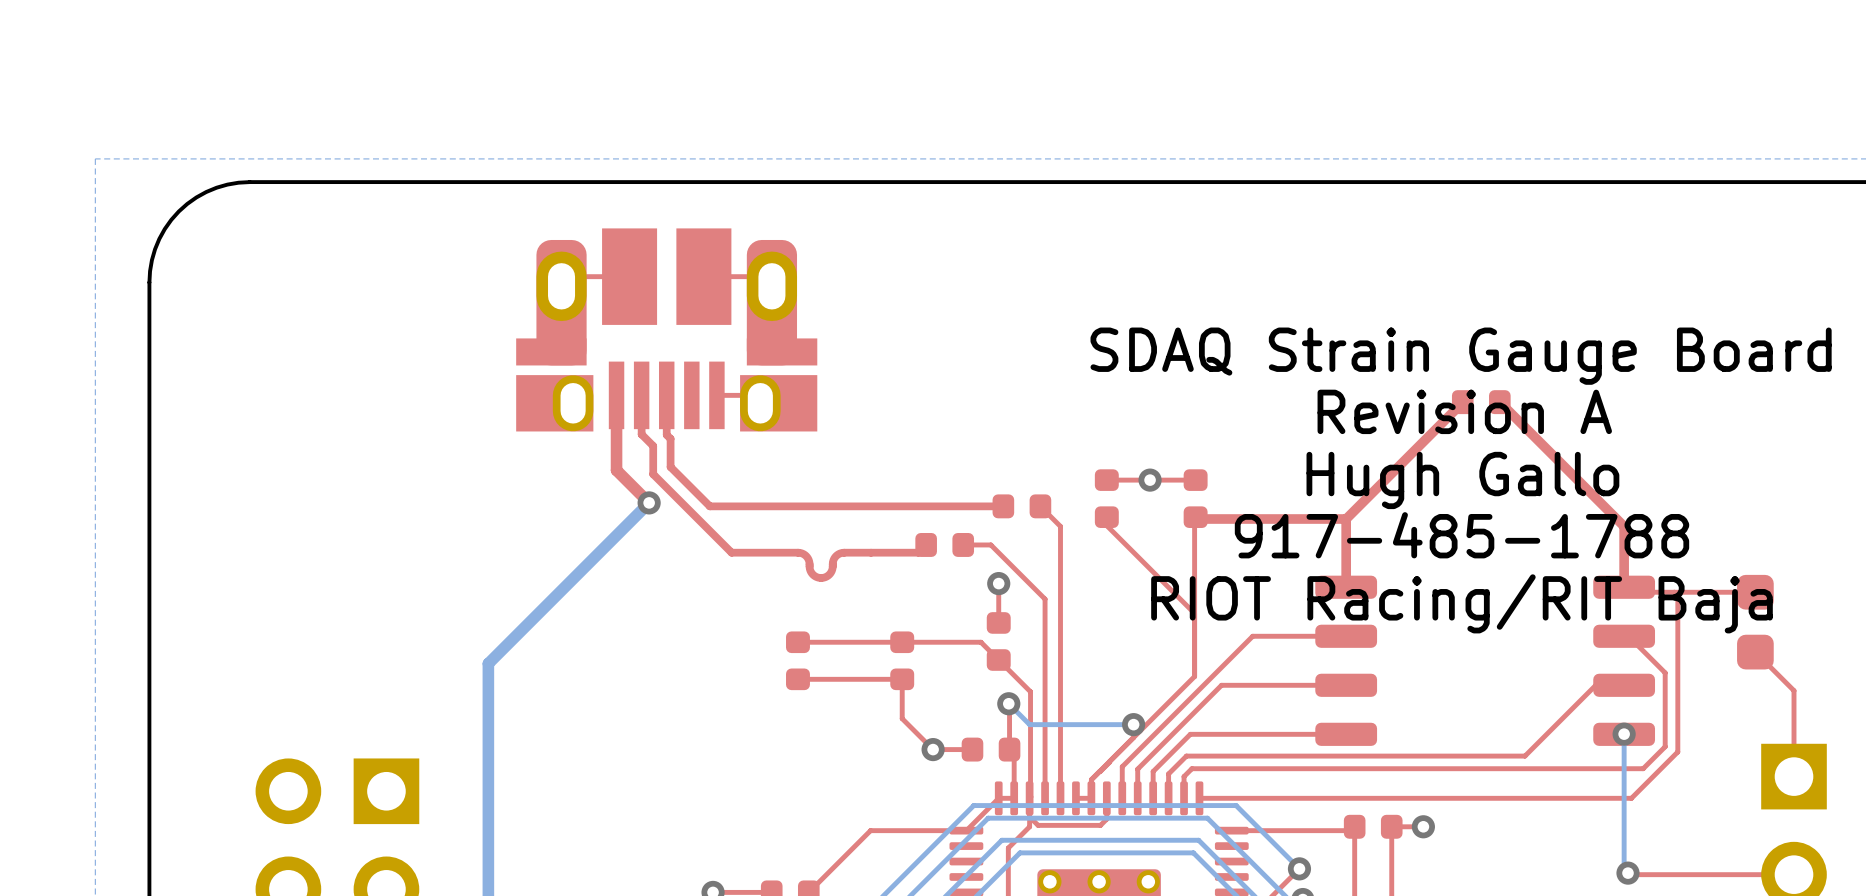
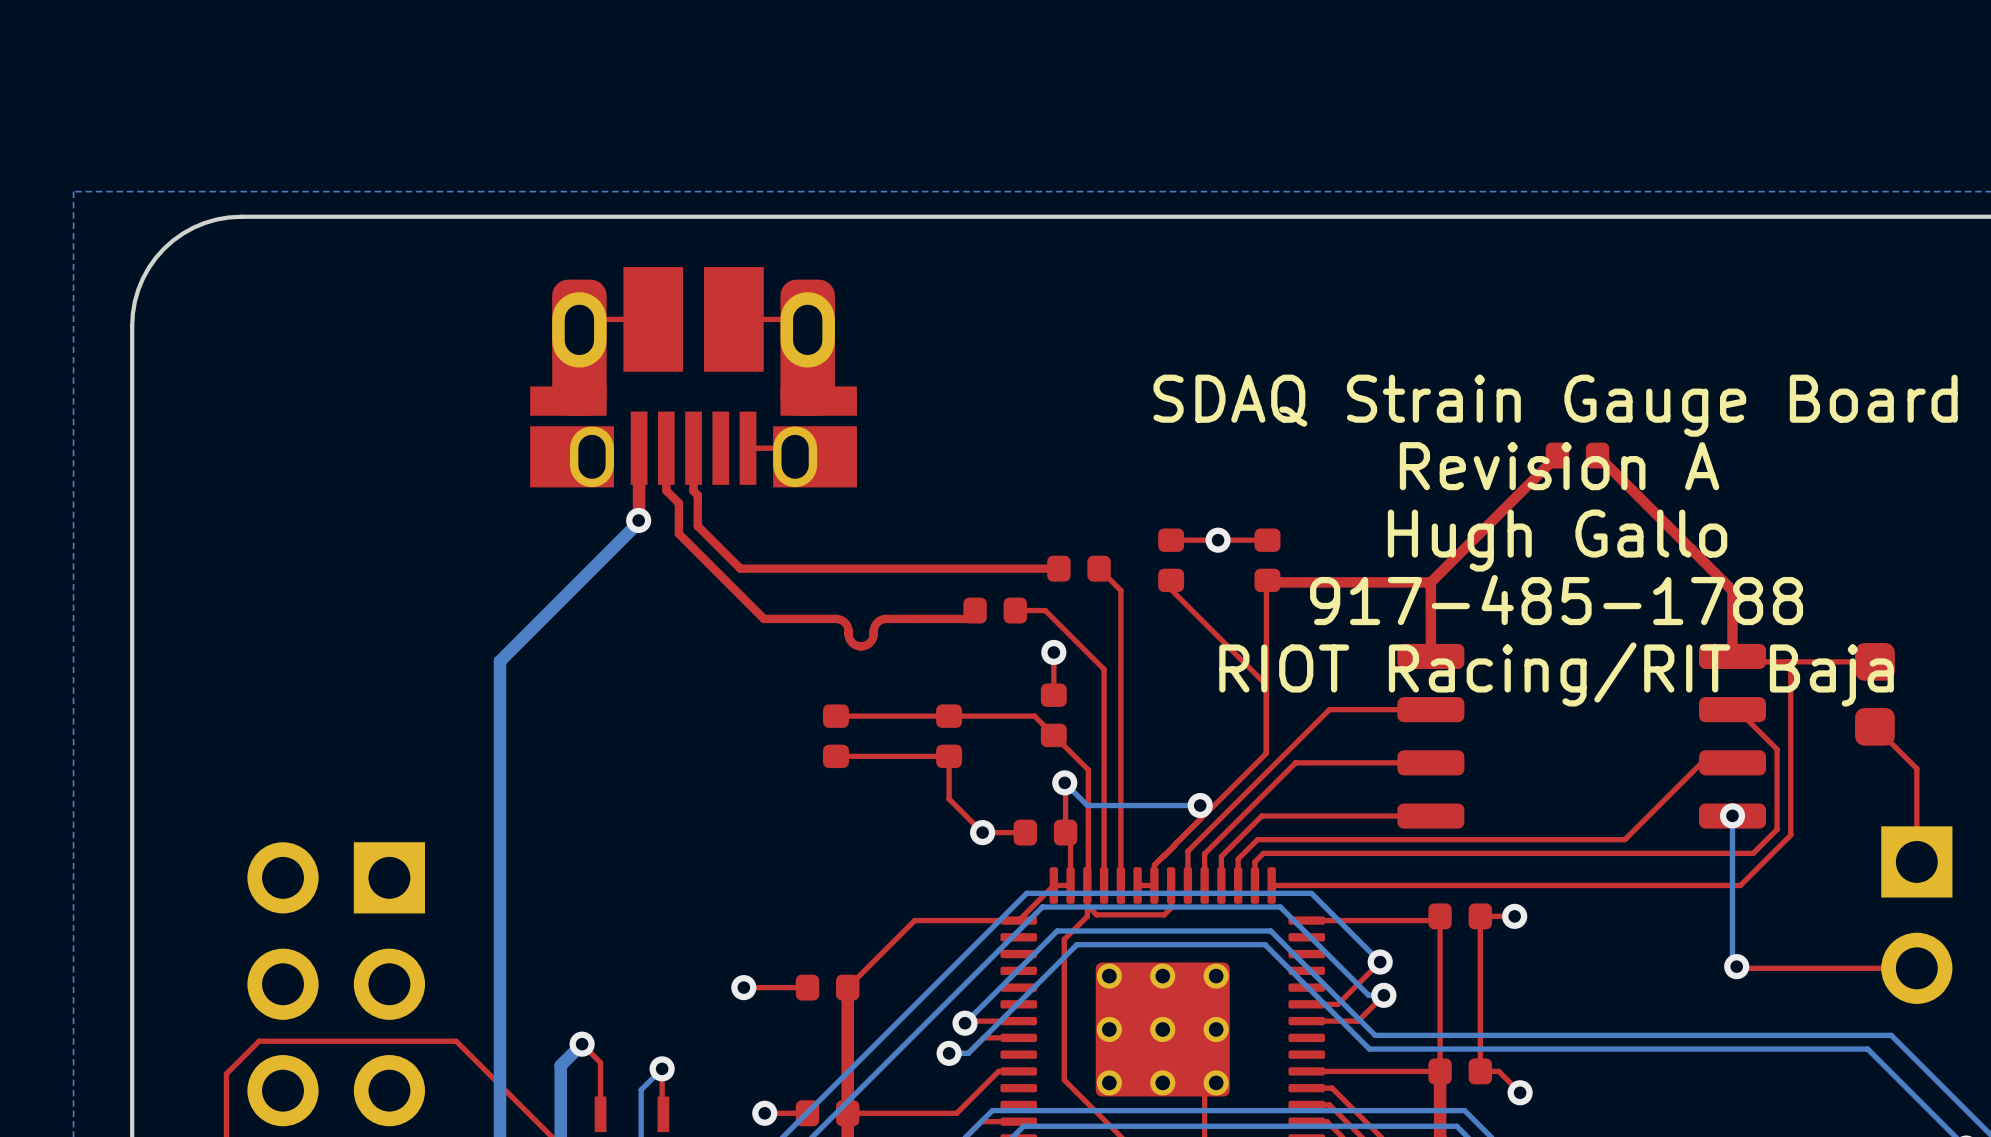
top track: (616, 461) (616, 470) (649, 502) -> none
bottom track: (649, 502) (488, 663) -> (638, 520) (500, 661) (500, 739)
via position: (649, 502) -> (638, 520)

